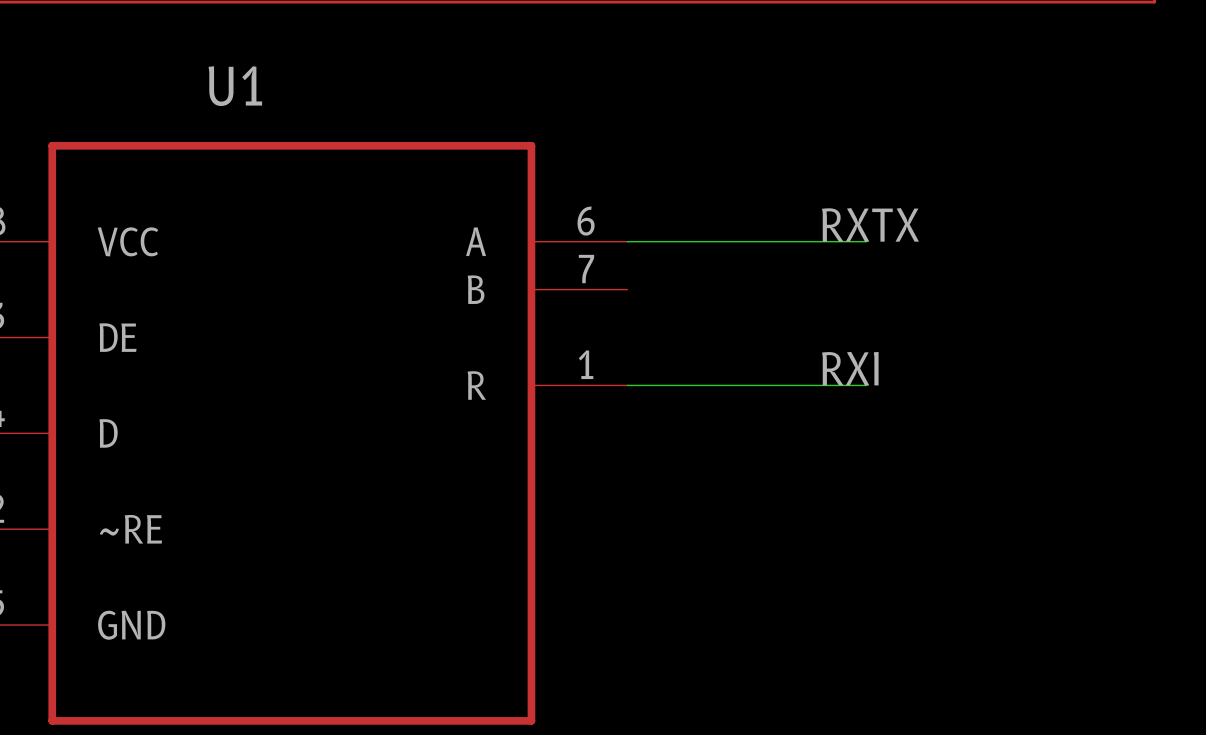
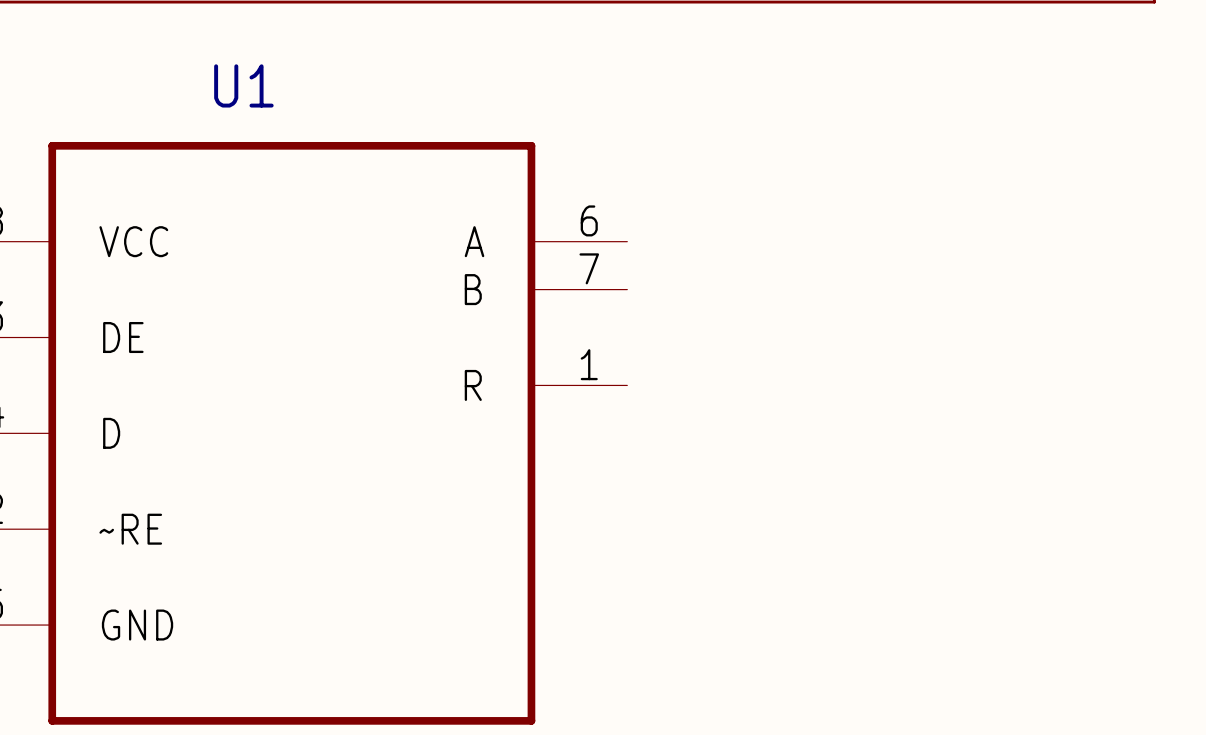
label: RXTX (870, 224) -> none
wire: (627, 241) (866, 241) -> none
label: RXI (850, 368) -> none
wire: (627, 385) (866, 385) -> none

